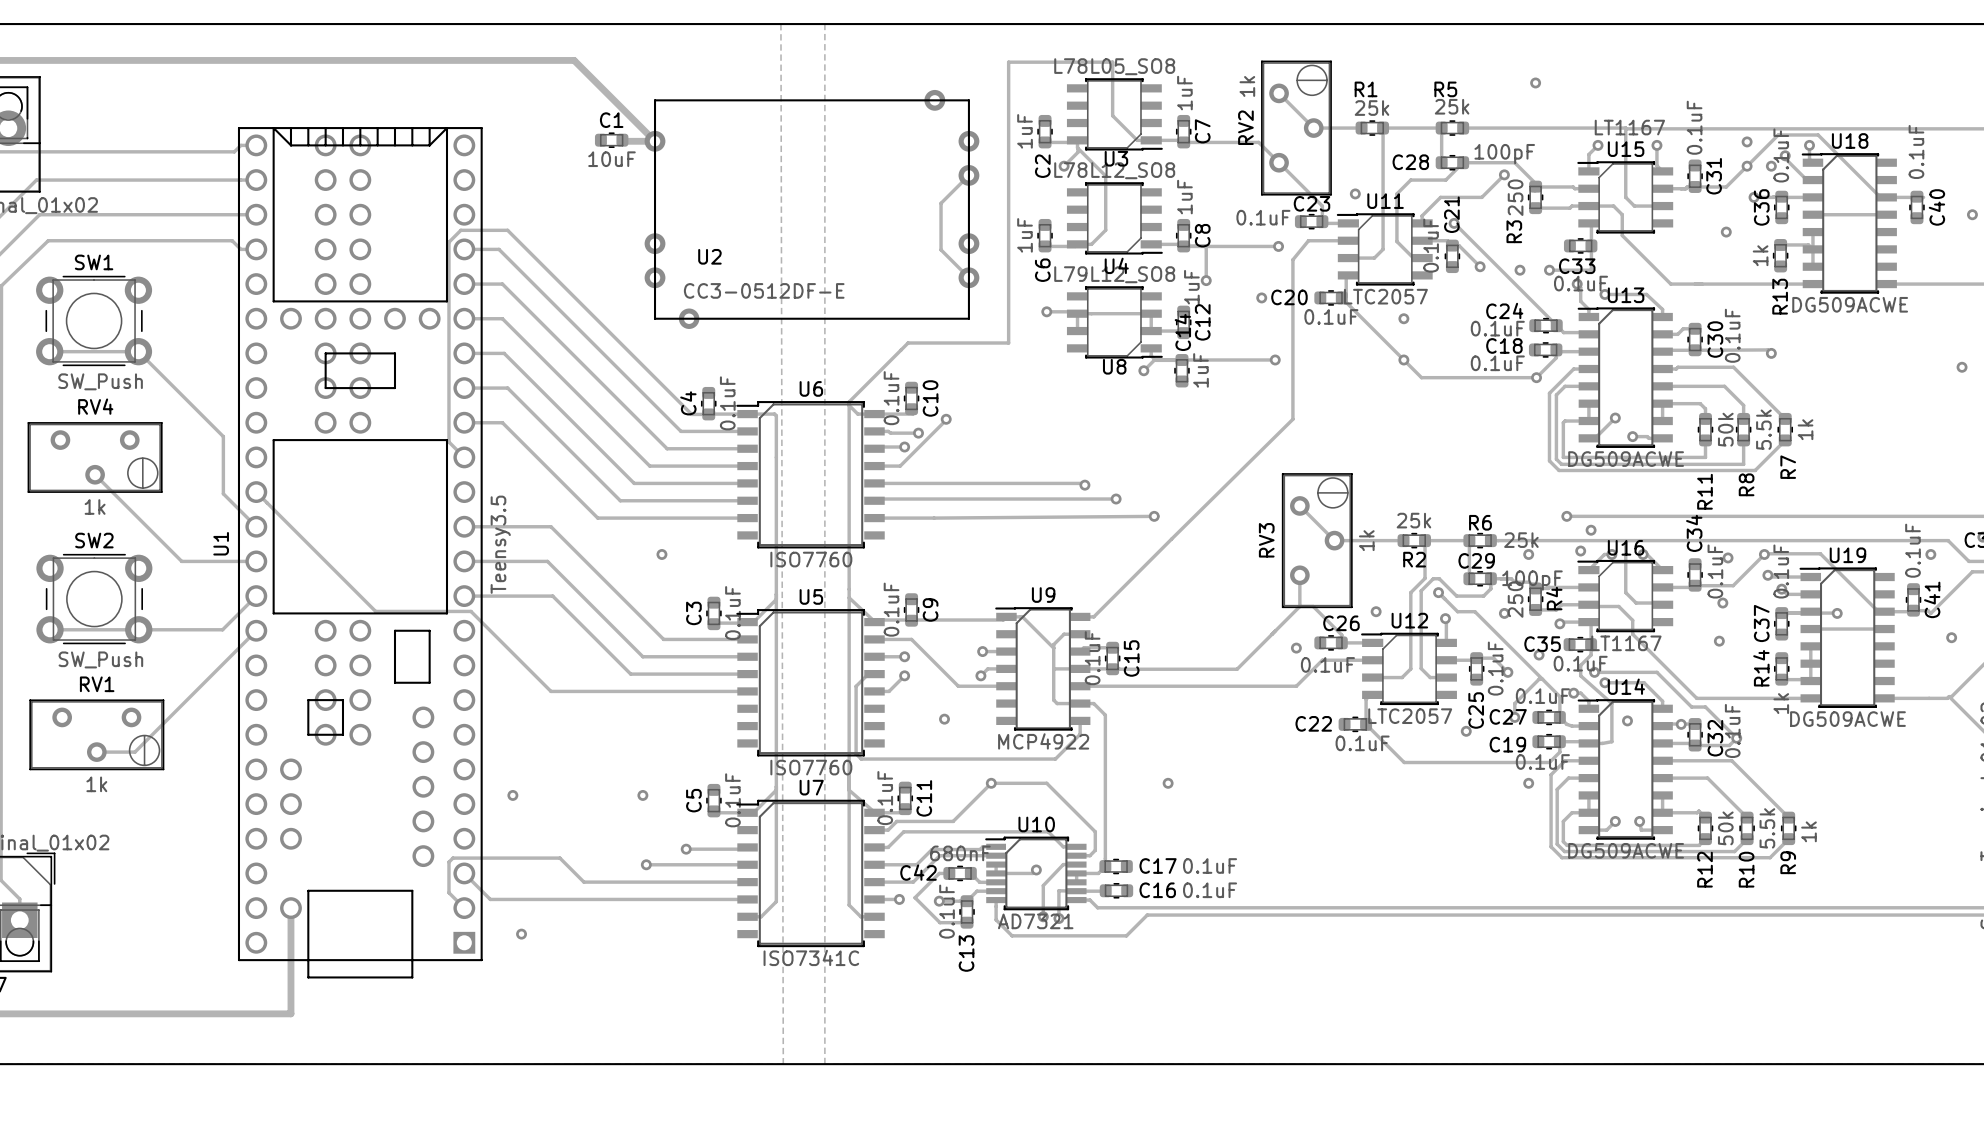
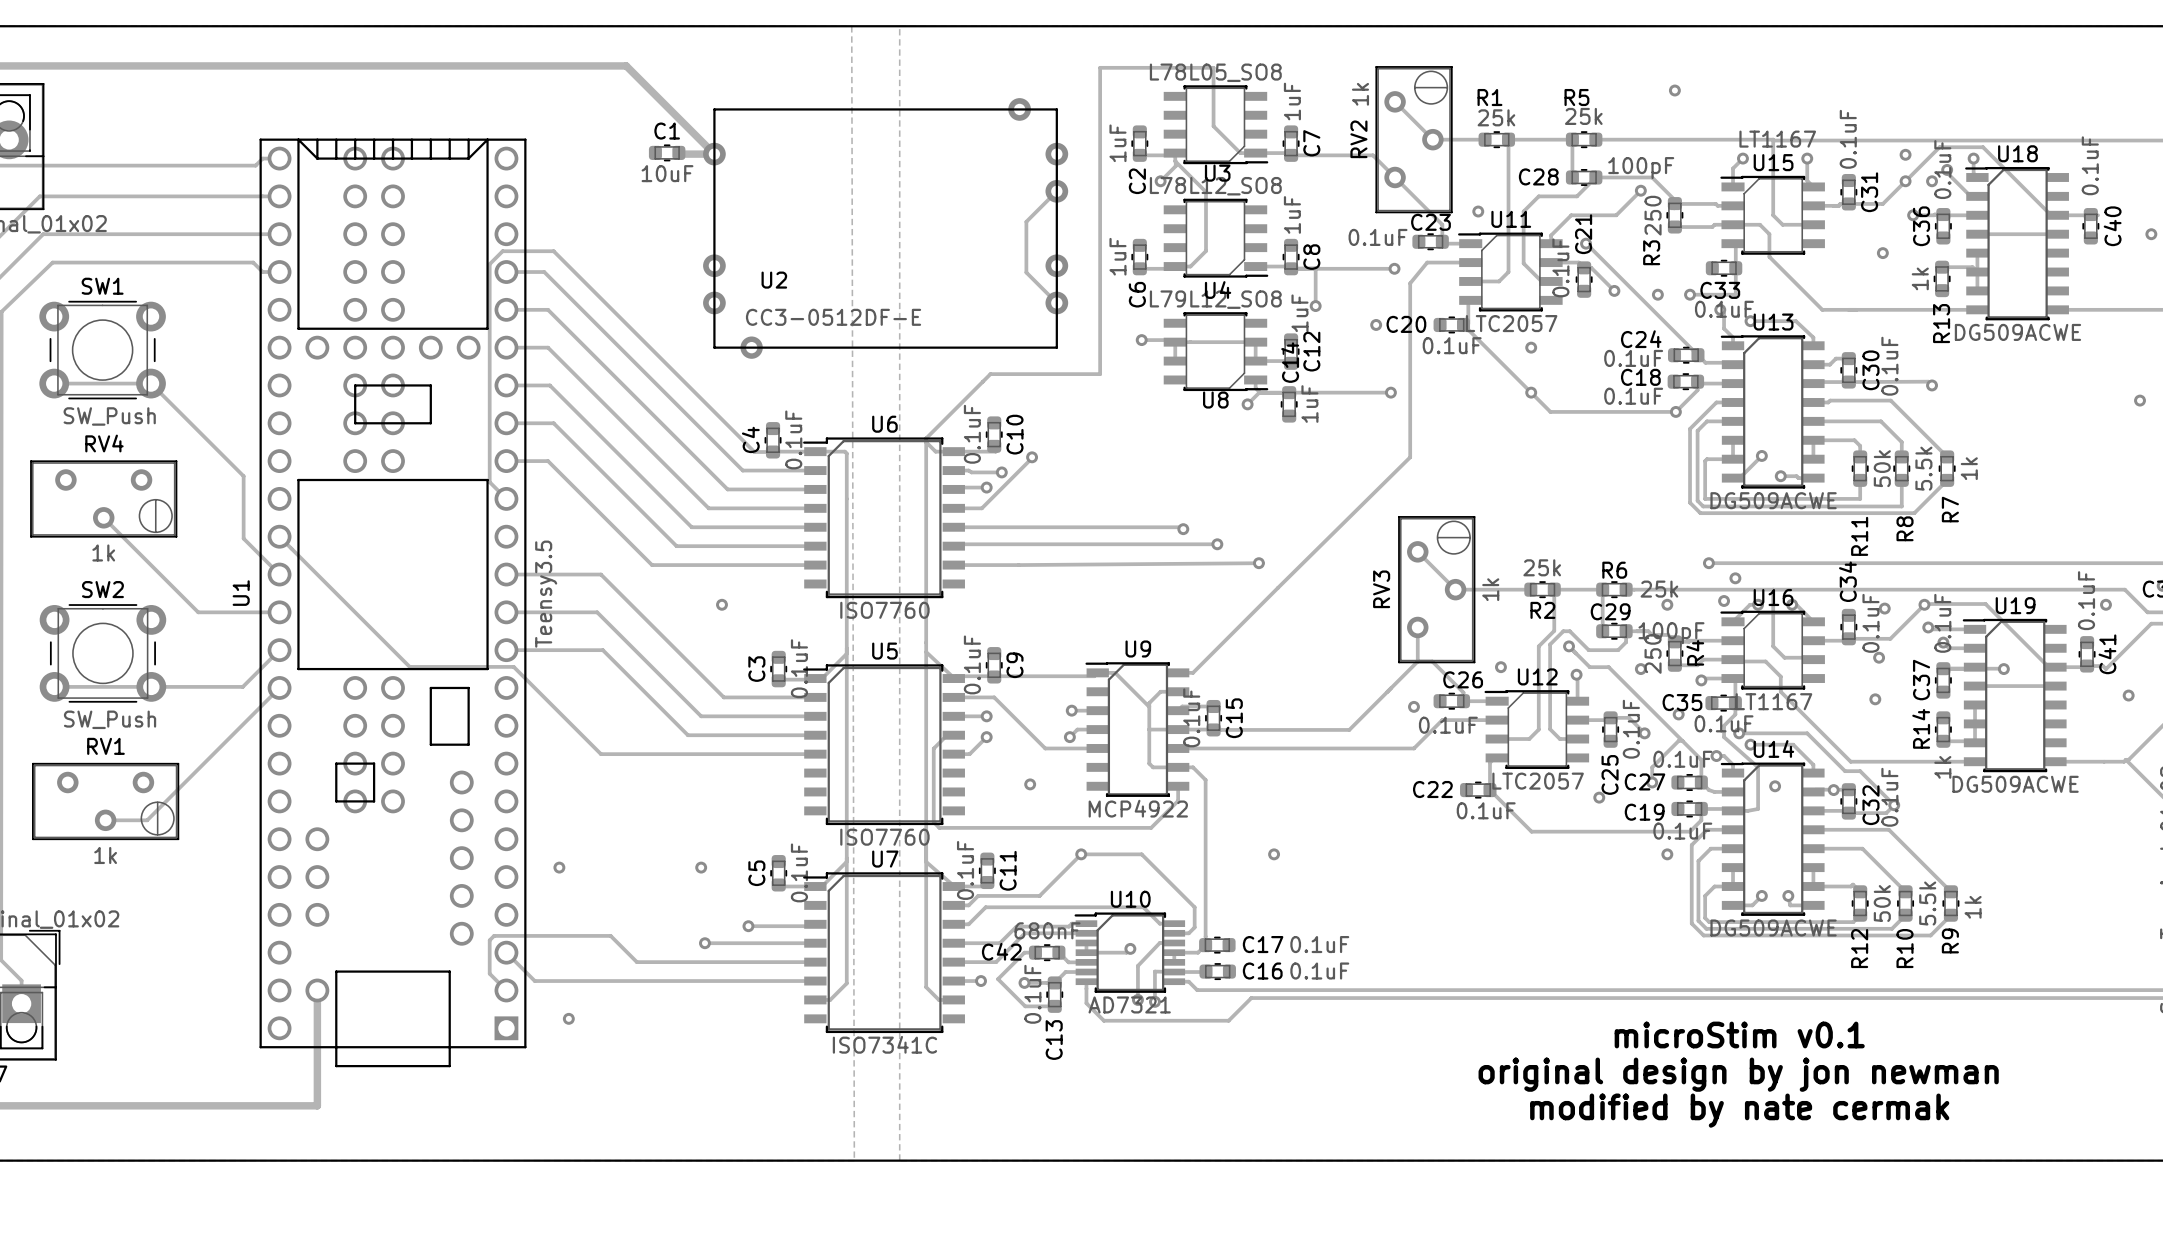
text: none -> microStim v0.1 (1739, 1034)
text: none -> original design by jon newman (1738, 1074)
text: none -> modified by nate cermak (1739, 1110)

